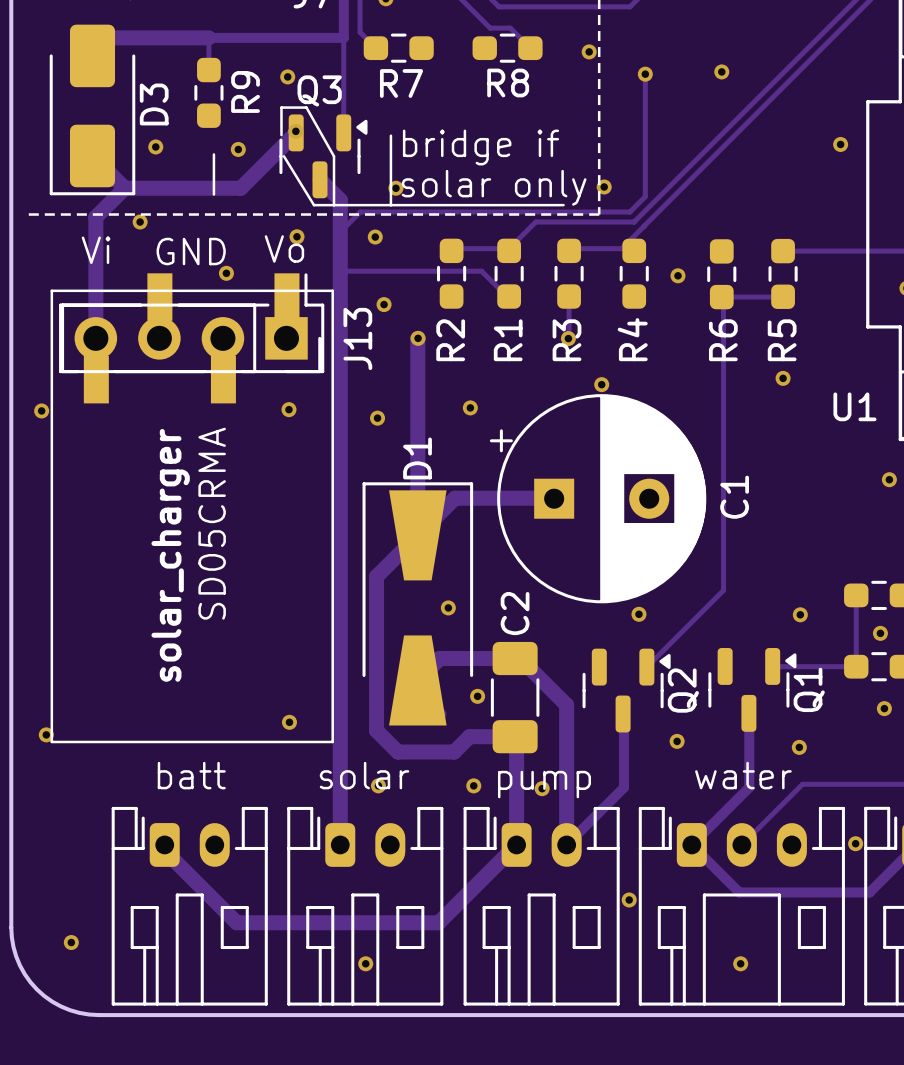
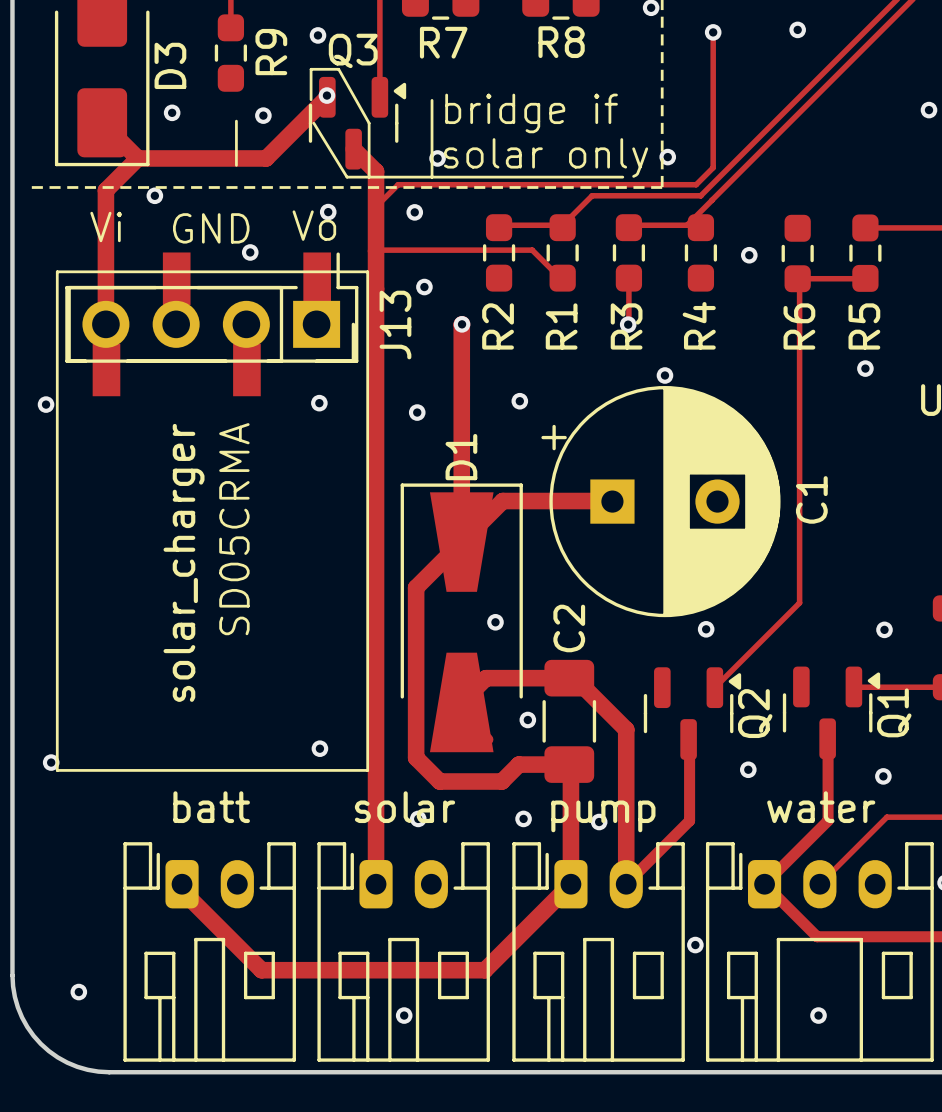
part value: none -> solar_charger (184, 562)
text: solar_charger (170, 555) -> none
part value: none -> batt (211, 807)
text: batt (191, 775) -> none
text: solar (364, 775) -> none
part value: none -> solar (405, 807)
part value: none -> water (821, 807)
text: water (743, 775) -> none
part value: none -> pump (603, 816)
text: pump (544, 784) -> none

